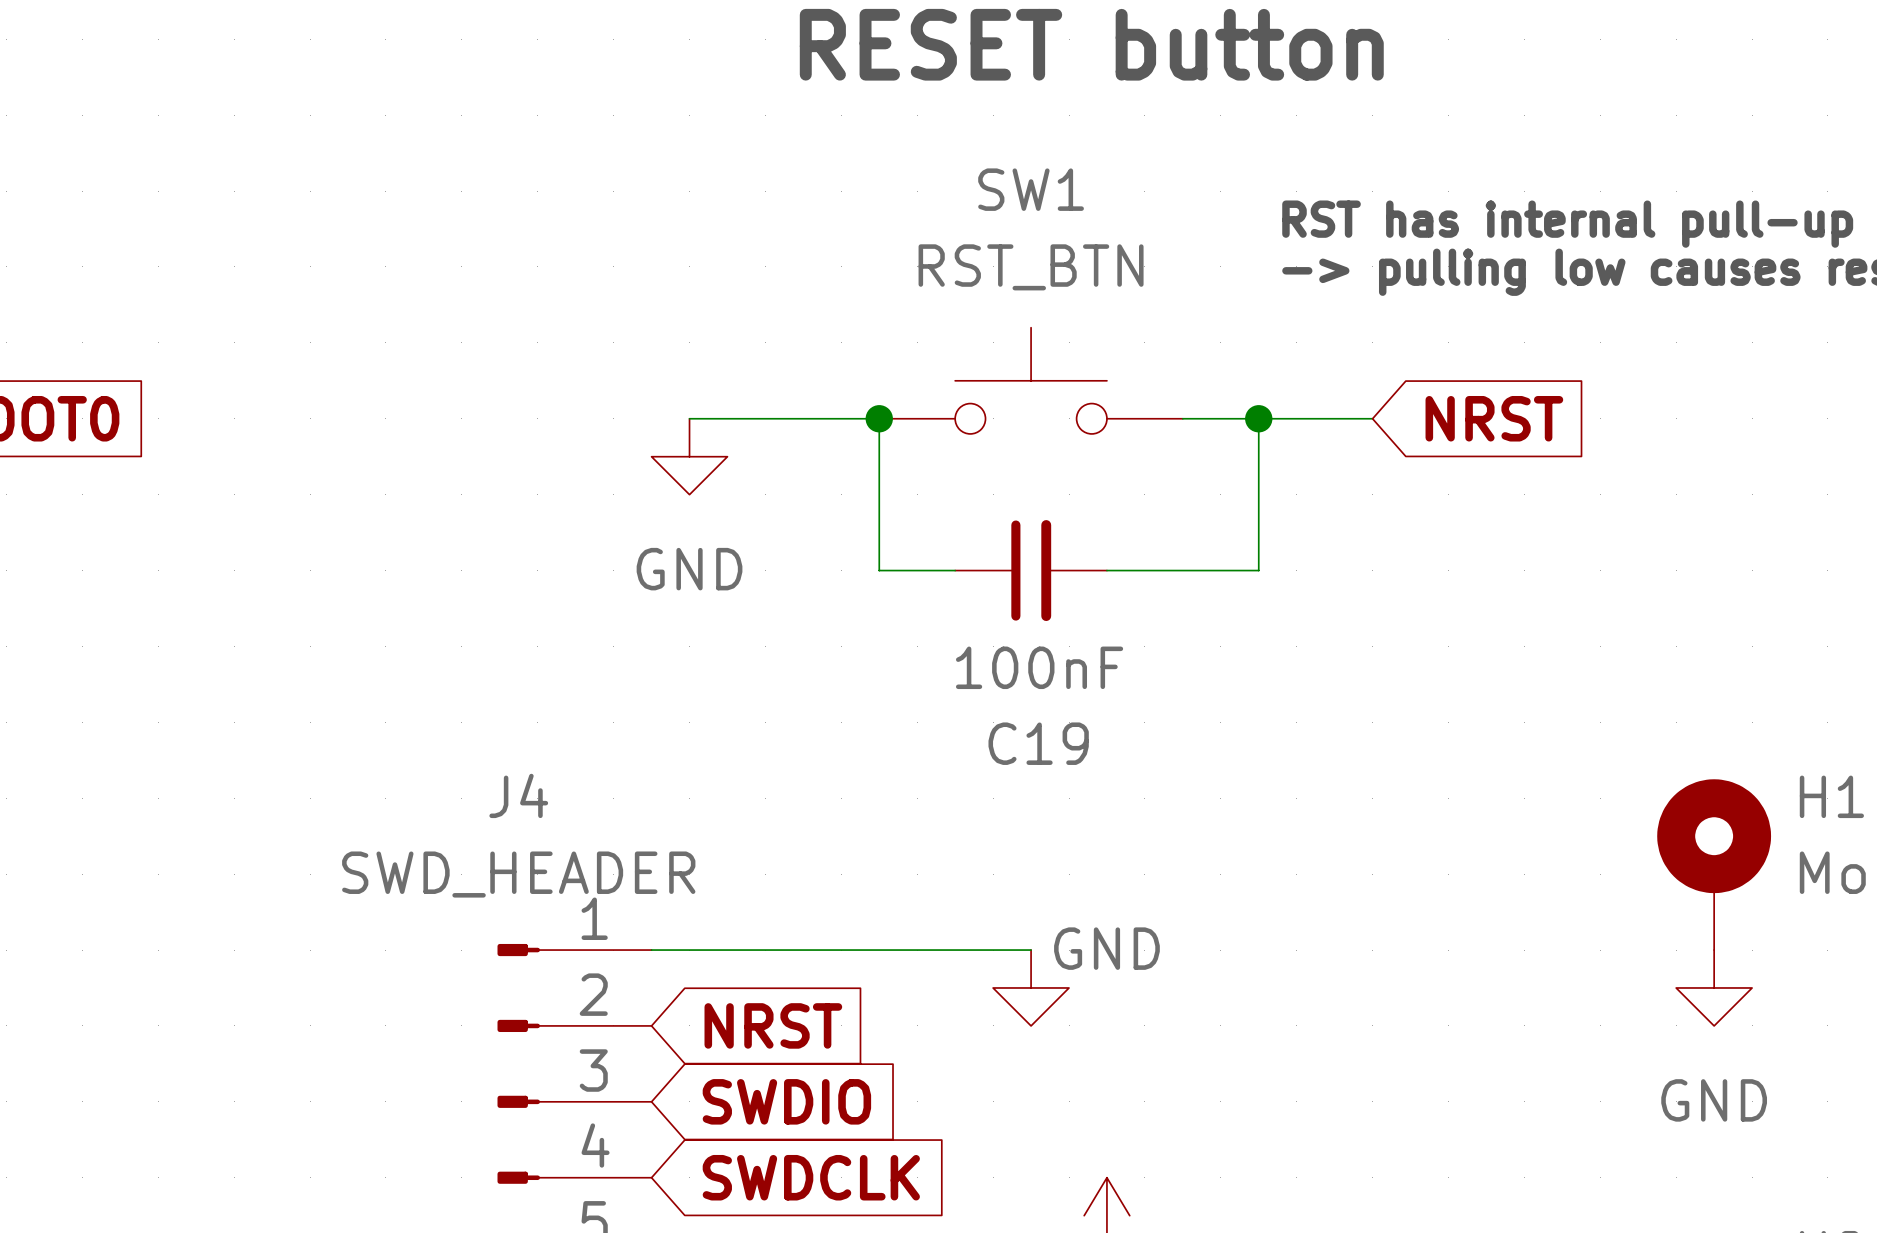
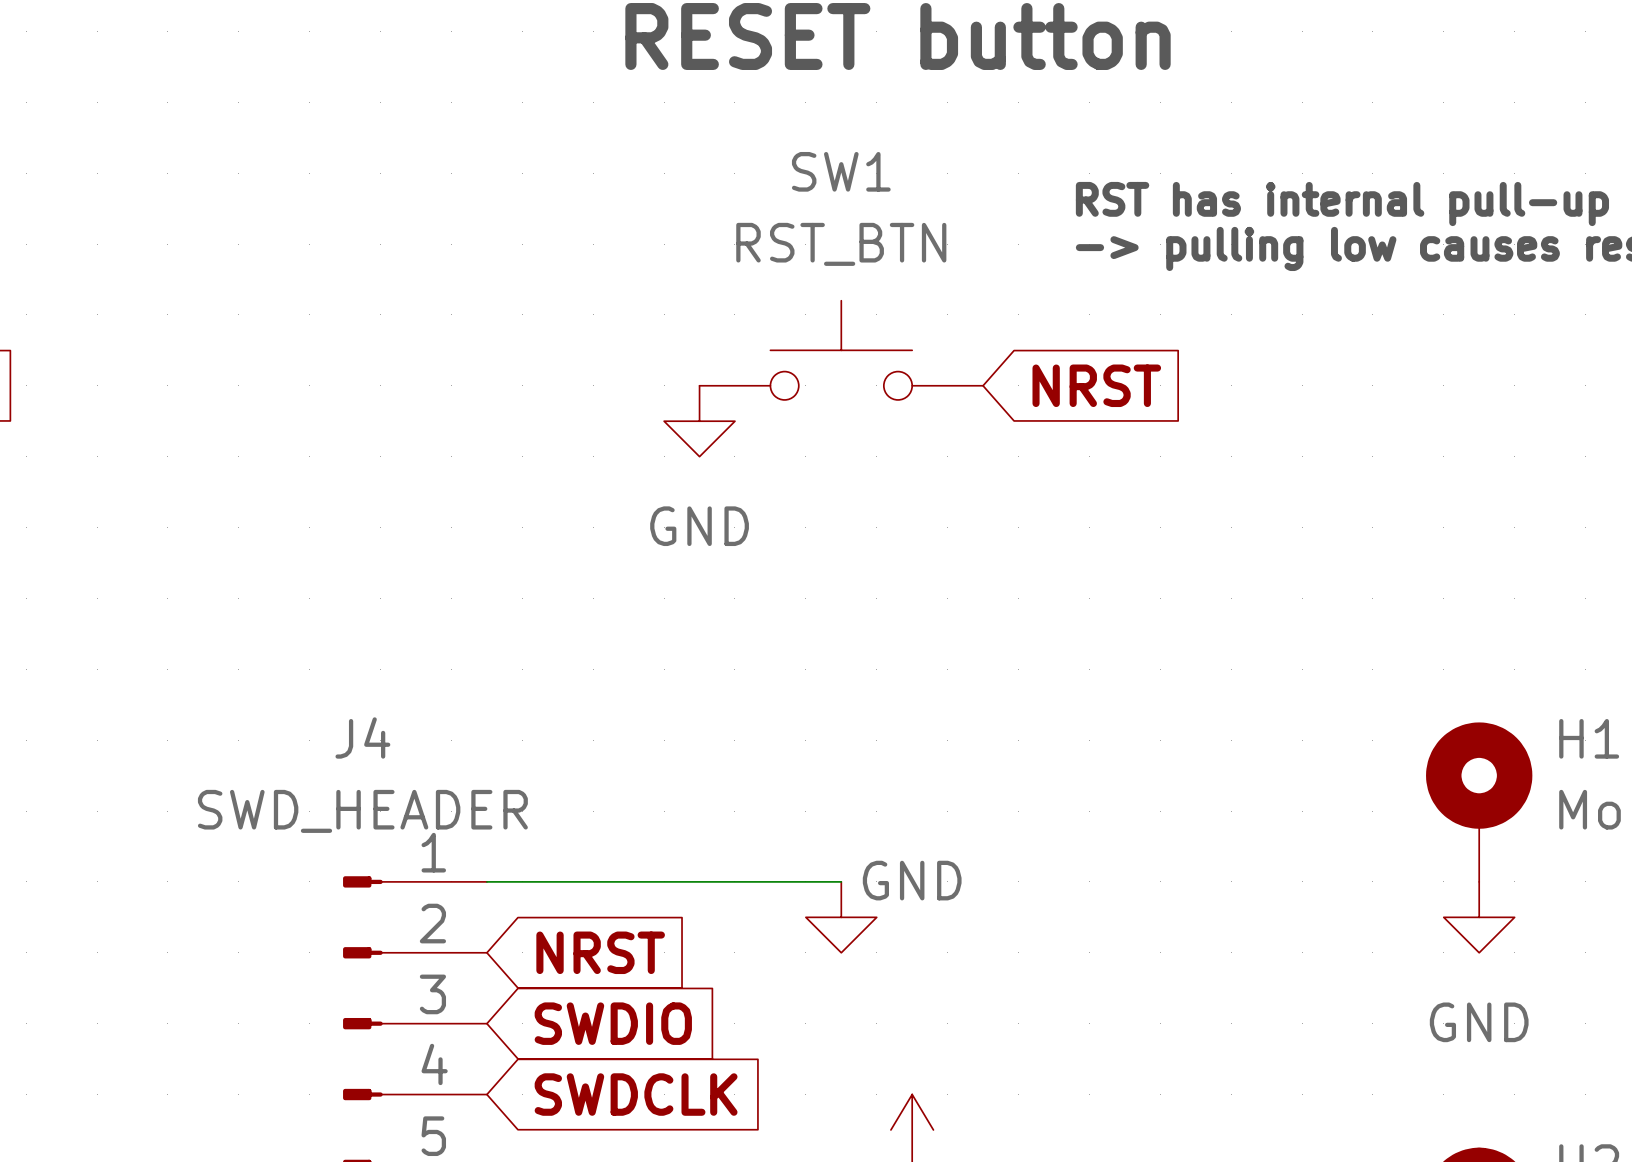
wire: (689, 418) (879, 418) (879, 570) (955, 570) -> none
junction: (879, 418) -> none
wire: (1182, 418) (1372, 418) -> none
wire: (1258, 418) (1258, 570) (1106, 570) -> none
junction: (1258, 418) -> none
global label position: NRST (1494, 418) -> NRST (1096, 385)
power symbol position: GND (689, 456) -> GND (699, 421)
C19: 100nF (1031, 570) -> none

